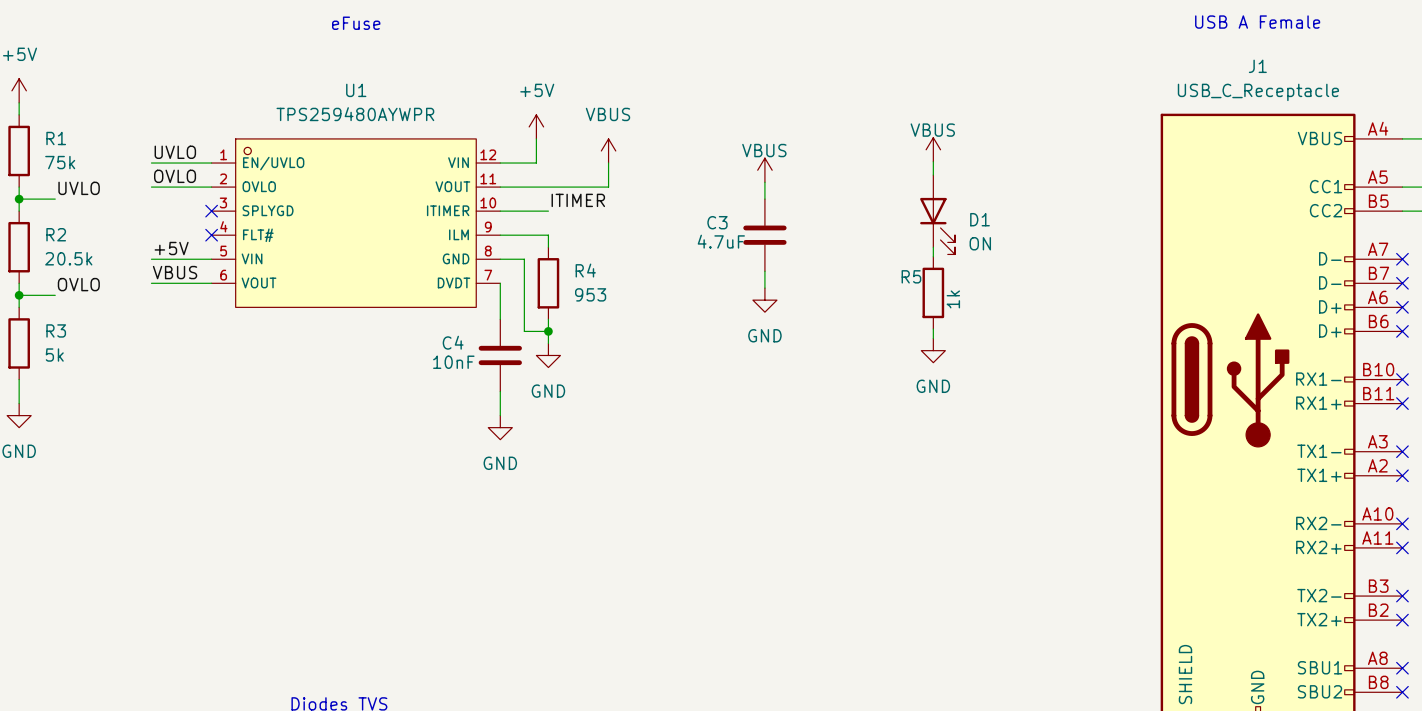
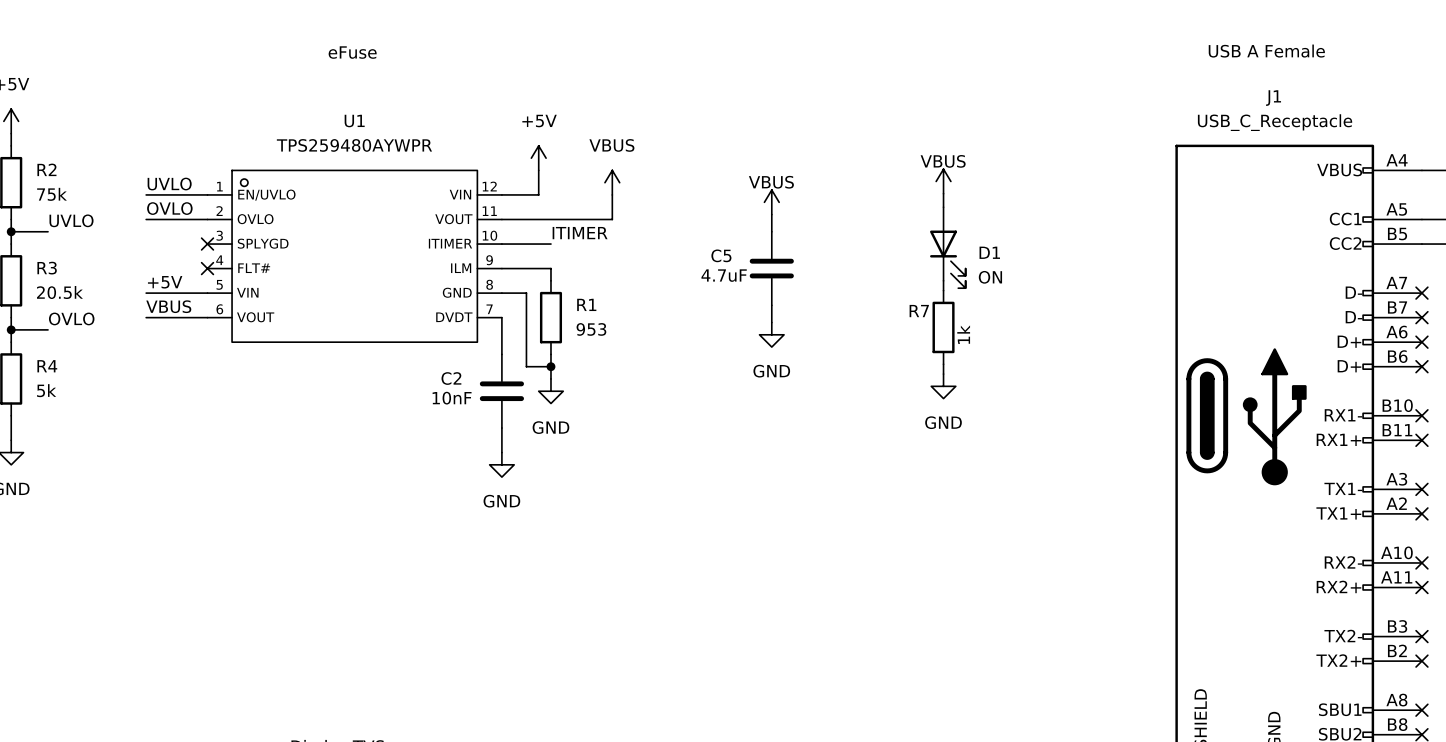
R1 name: R1 (56, 138) -> R2 (46, 169)
C3 name: C3 (717, 222) -> C5 (721, 255)
R2 name: R2 (56, 234) -> R3 (47, 268)
R4 name: R4 (585, 270) -> R1 (586, 304)
R5 name: R5 (911, 276) -> R7 (919, 311)
R3 name: R3 (56, 330) -> R4 (47, 366)
C4 name: C4 (453, 342) -> C2 (451, 378)

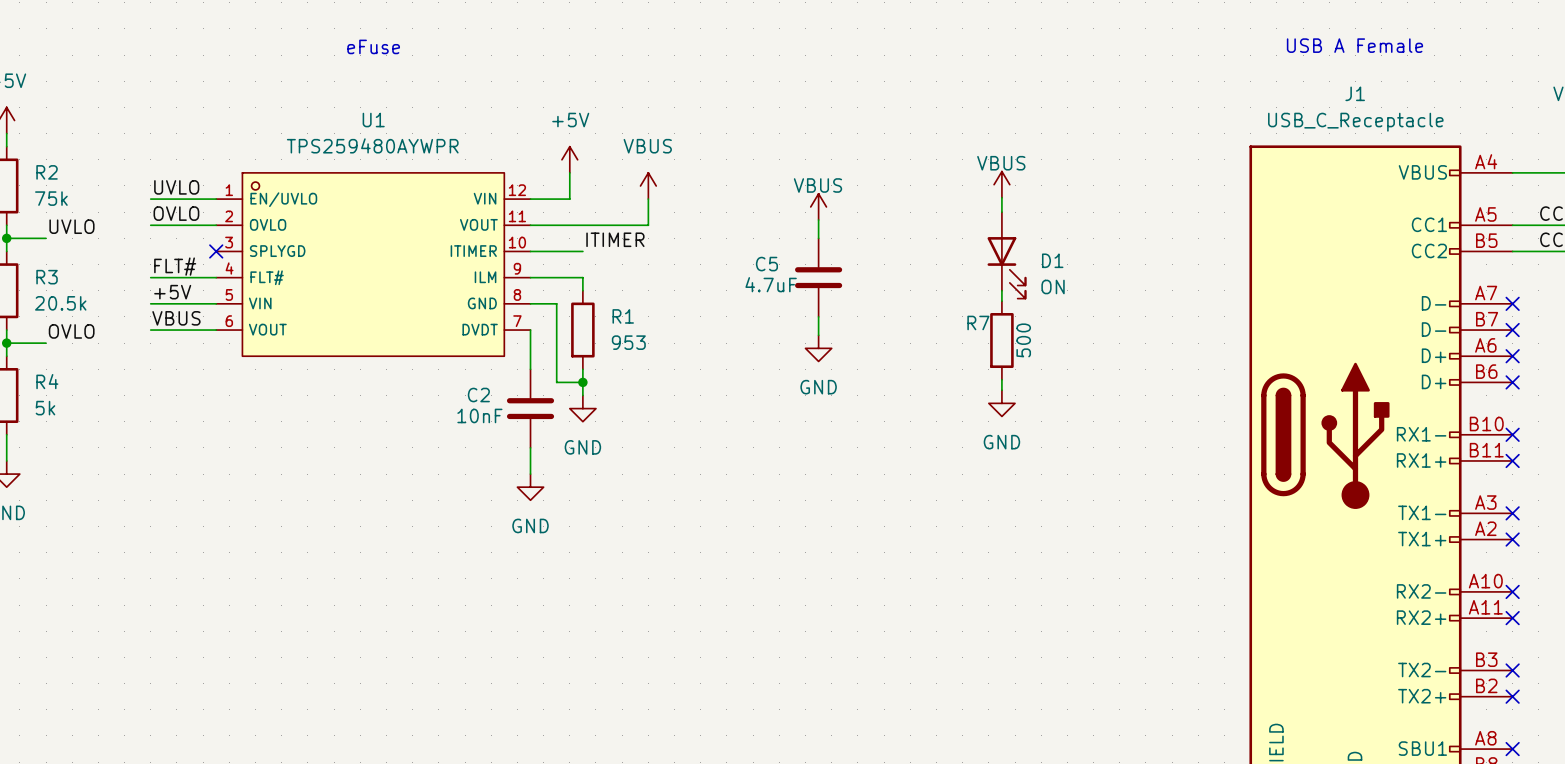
label: none -> FLT# (175, 266)
wire: none -> (150, 277) (216, 277)
no-connect mark: (207, 268) -> none
R7 value: 1k (963, 334) -> 500 (1023, 340)

